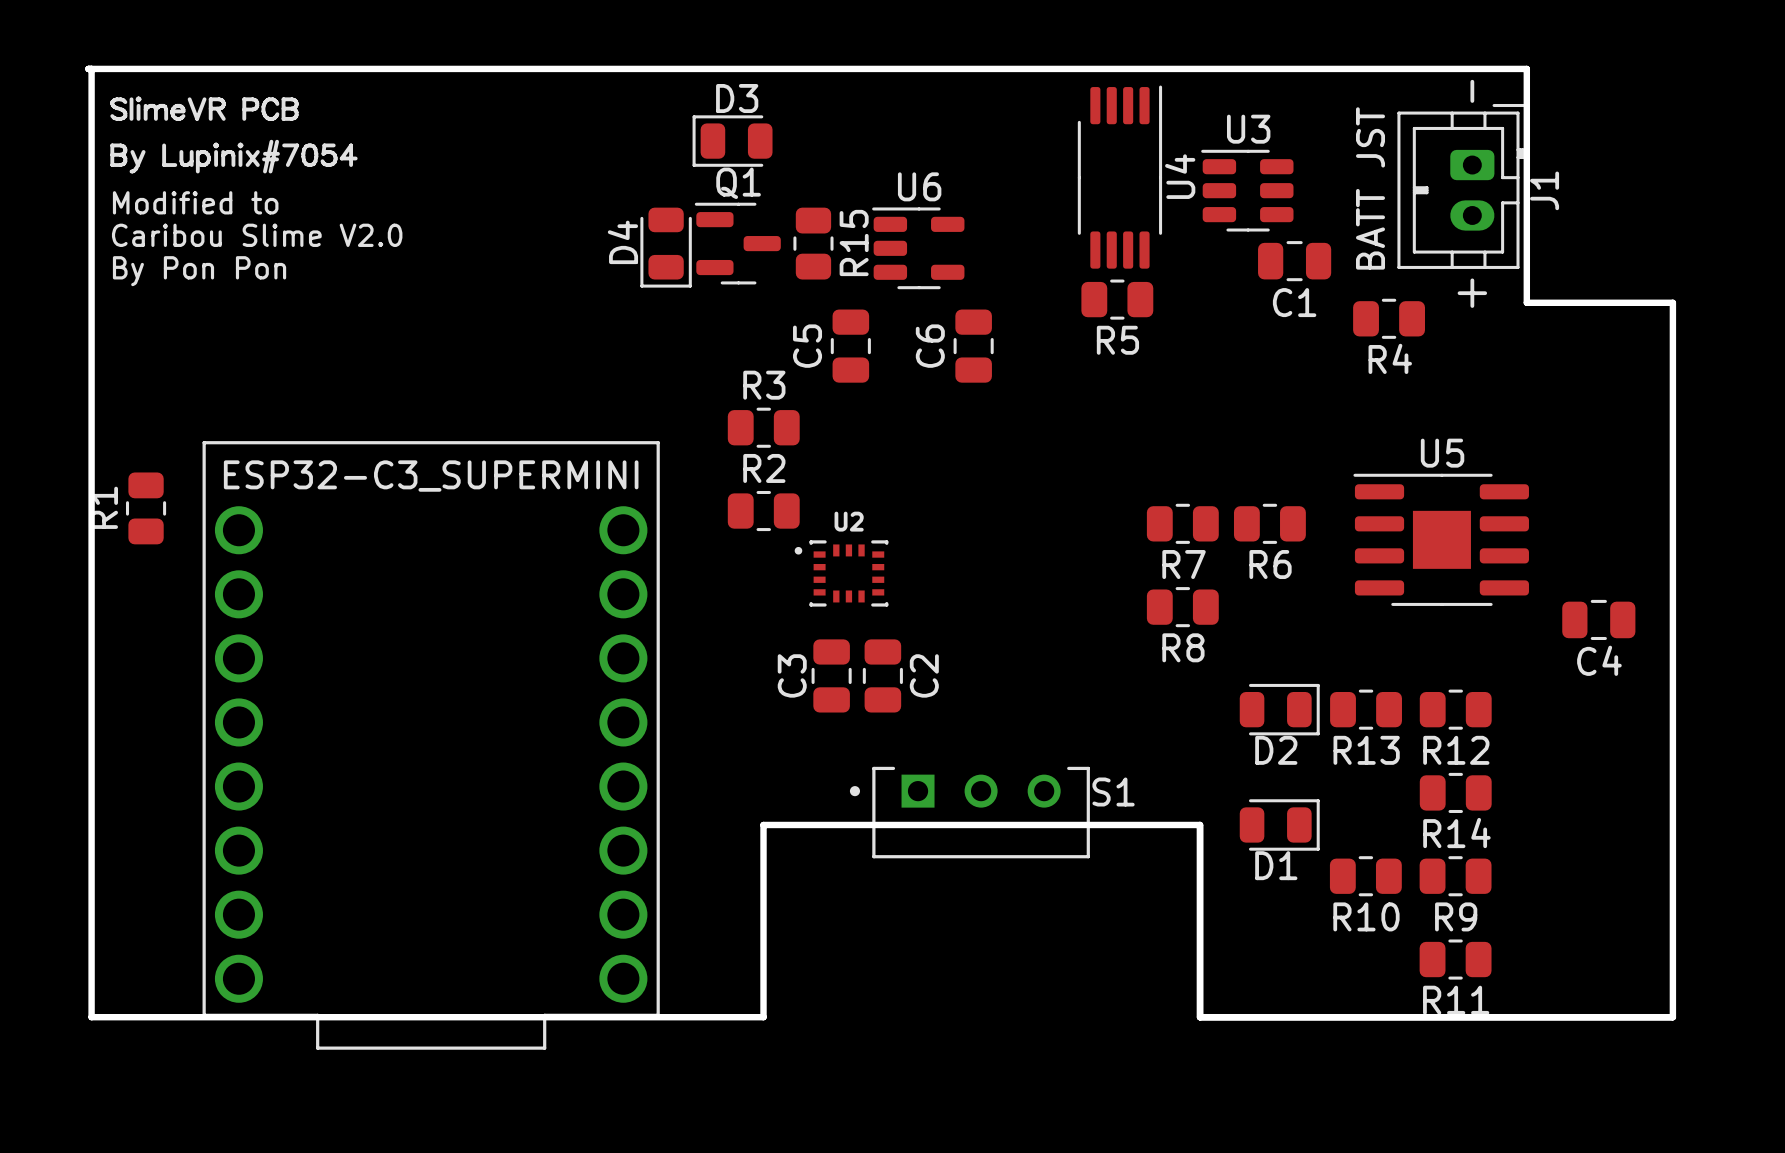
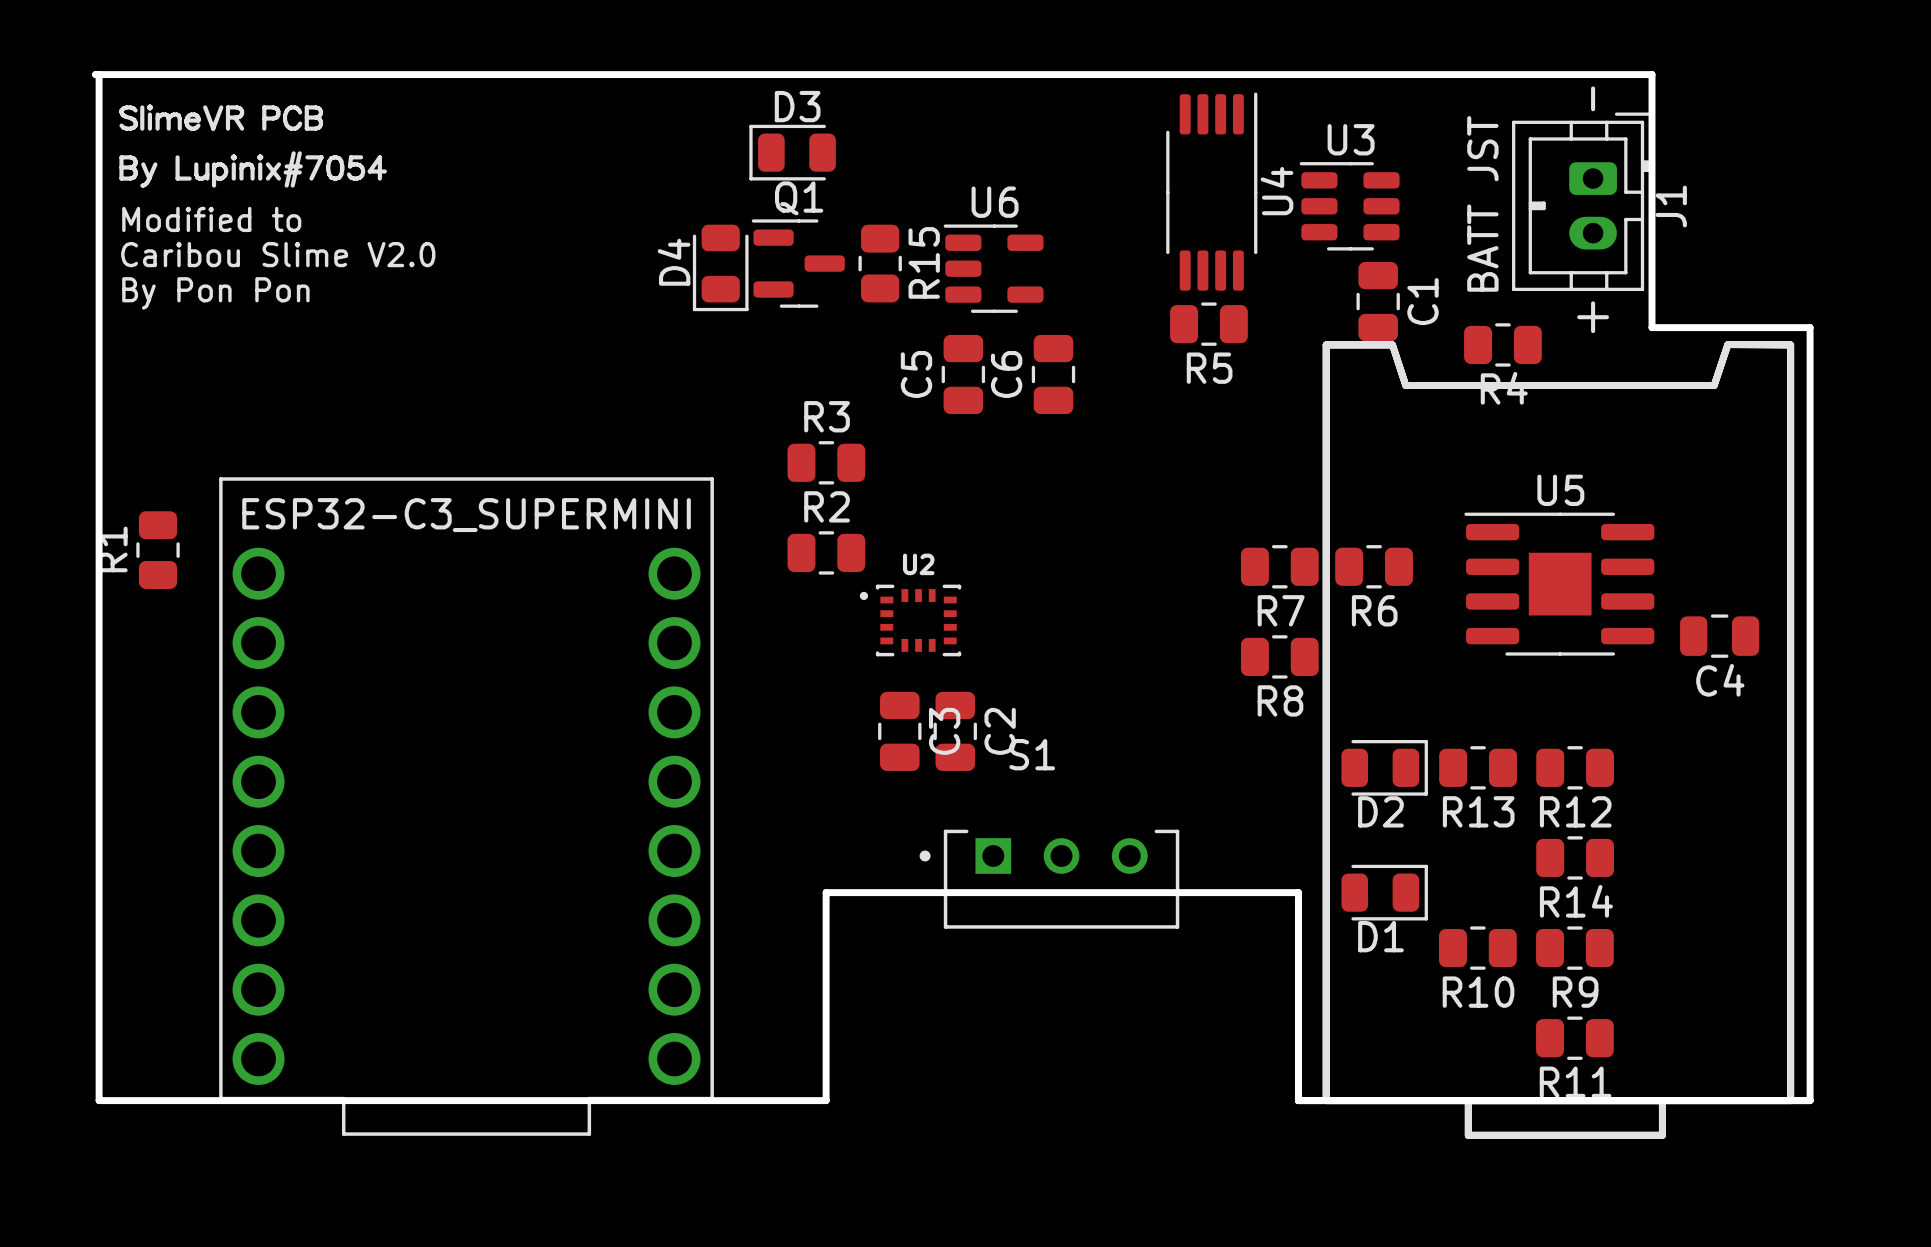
C1 rotation: 0° (1294, 261) -> 90° clockwise (1378, 301)
C1 name position: C1 (1294, 302) -> C1 (1423, 301)
line: none -> (1727, 344) (1714, 385) (1405, 385) (1392, 344) (1326, 344) (1326, 1100) (1790, 1100) (1790, 344) (1727, 344)
C5 position: (850, 346) -> (963, 374)
C4 position: (1598, 619) -> (1719, 636)
C3 name position: C3 (792, 675) -> C3 (944, 731)
S1 name position: S1 (1113, 792) -> S1 (1032, 754)
line: none -> (1468, 1100) (1468, 1135) (1662, 1135) (1662, 1100)

